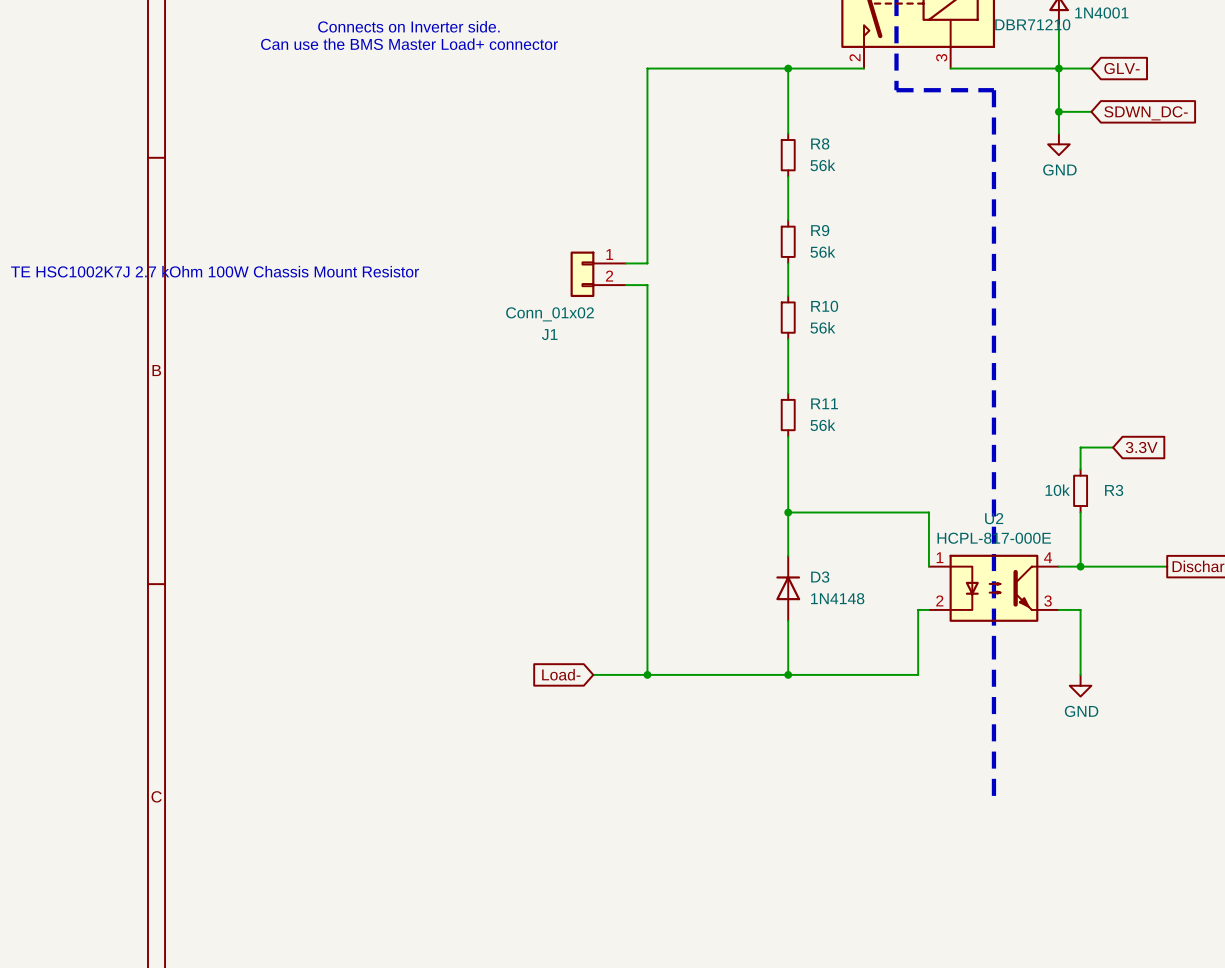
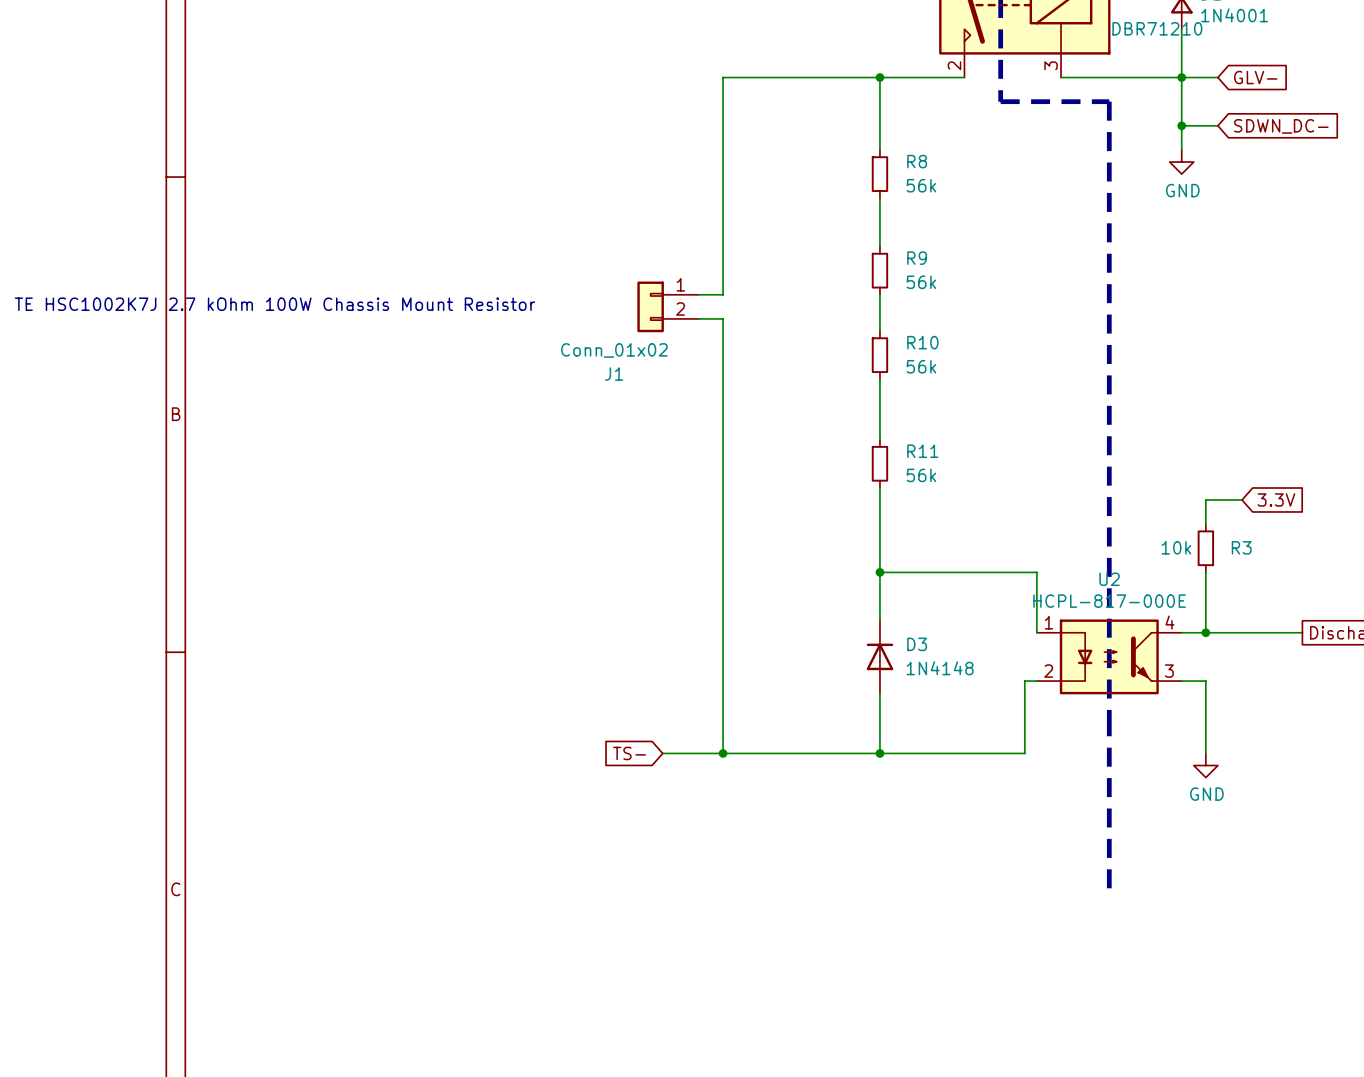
text: Connects on Inverter side. (408, 26) -> none
text: Can use the BMS Master Load+ connector (409, 44) -> none
global label: Load- (561, 674) -> TS- (629, 753)

